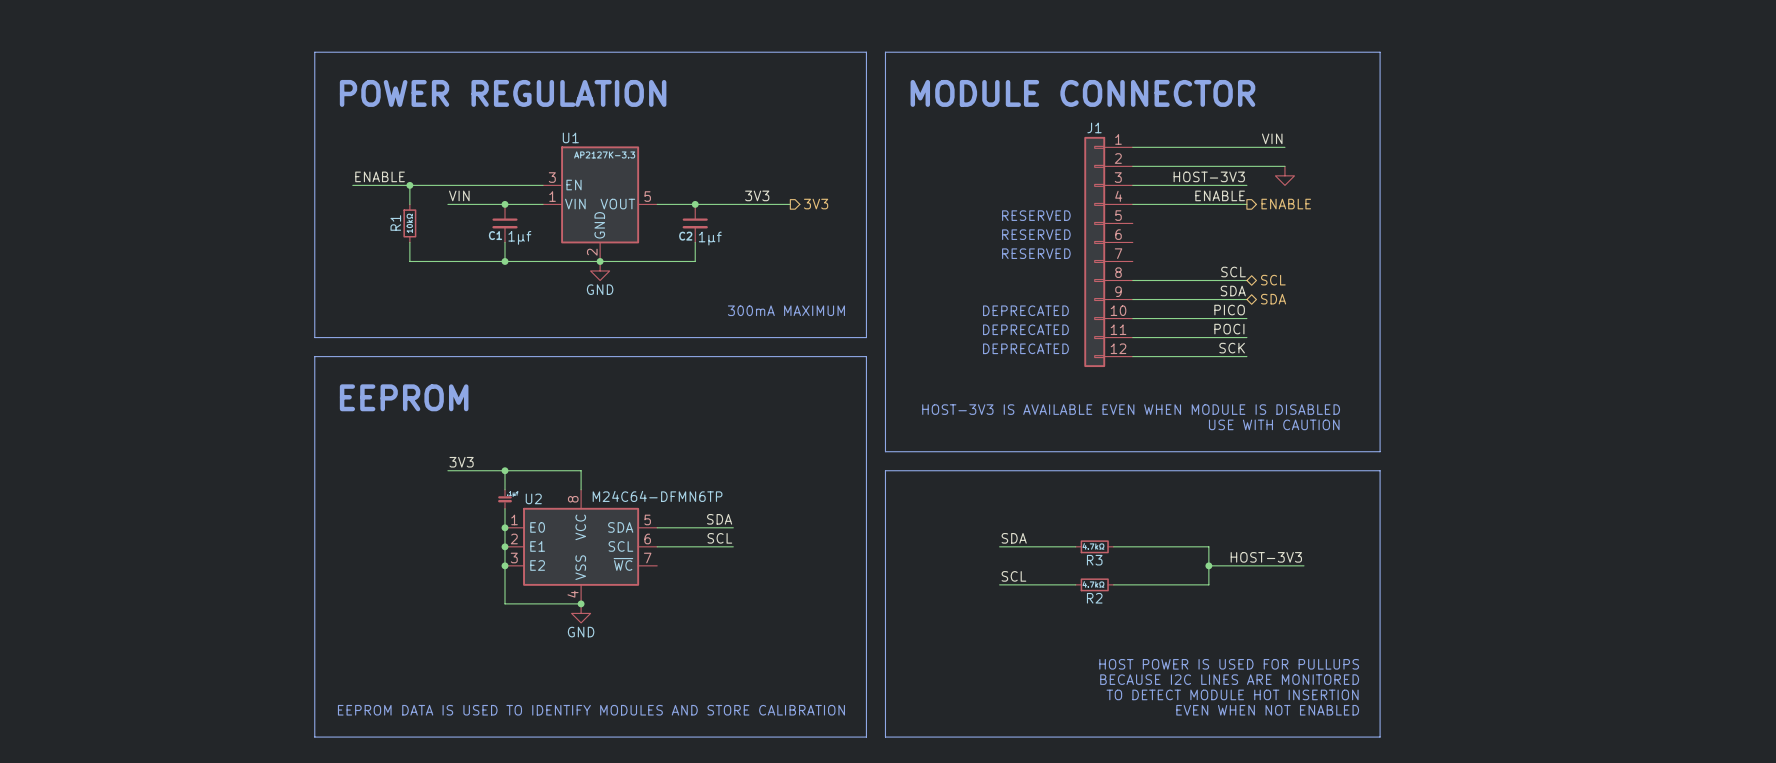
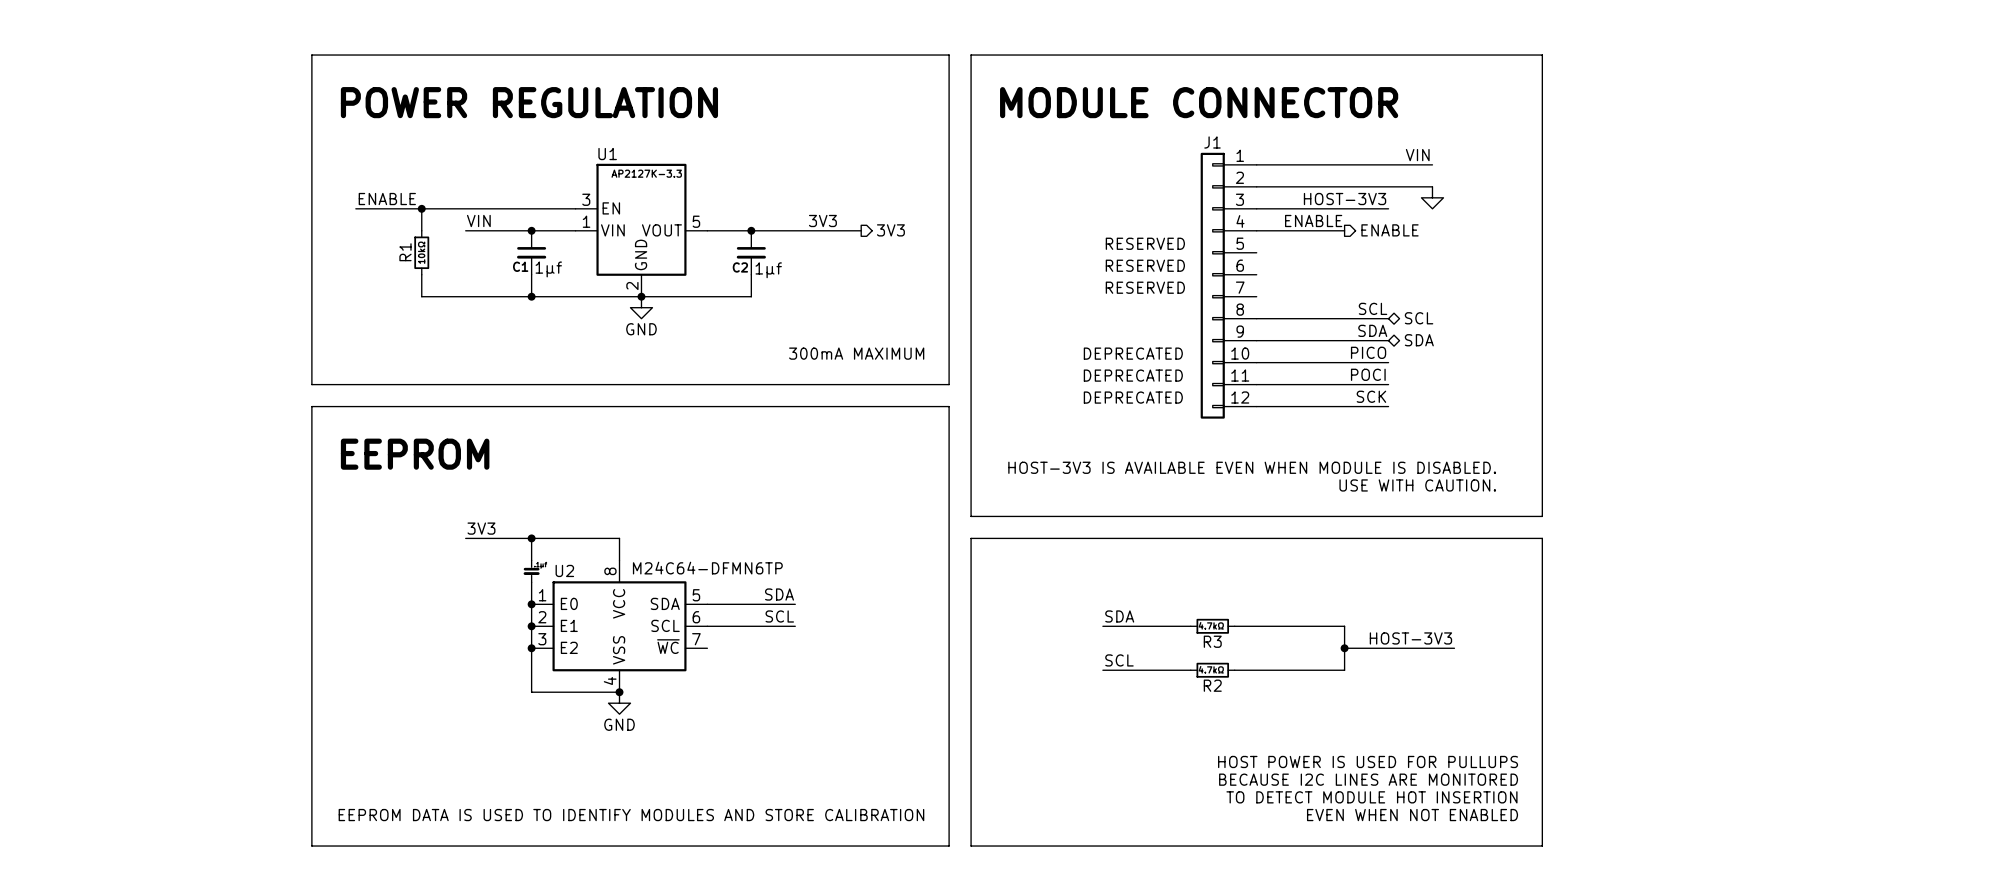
label position: ENABLE (1220, 195) -> ENABLE (1313, 220)
wire: (1208, 204) (1246, 204) -> none
hierarchical label position: ENABLE (1286, 204) -> ENABLE (1390, 230)
text: HOST-3V3 IS AVAILABLE EVEN WHEN MODULE IS DISABLED (1131, 409) -> HOST-3V3 IS AVAILABLE EVEN WHEN MODULE IS DISABLED. (1252, 467)
text: USE WITH CAUTION (1274, 424) -> USE WITH CAUTION. (1417, 485)

